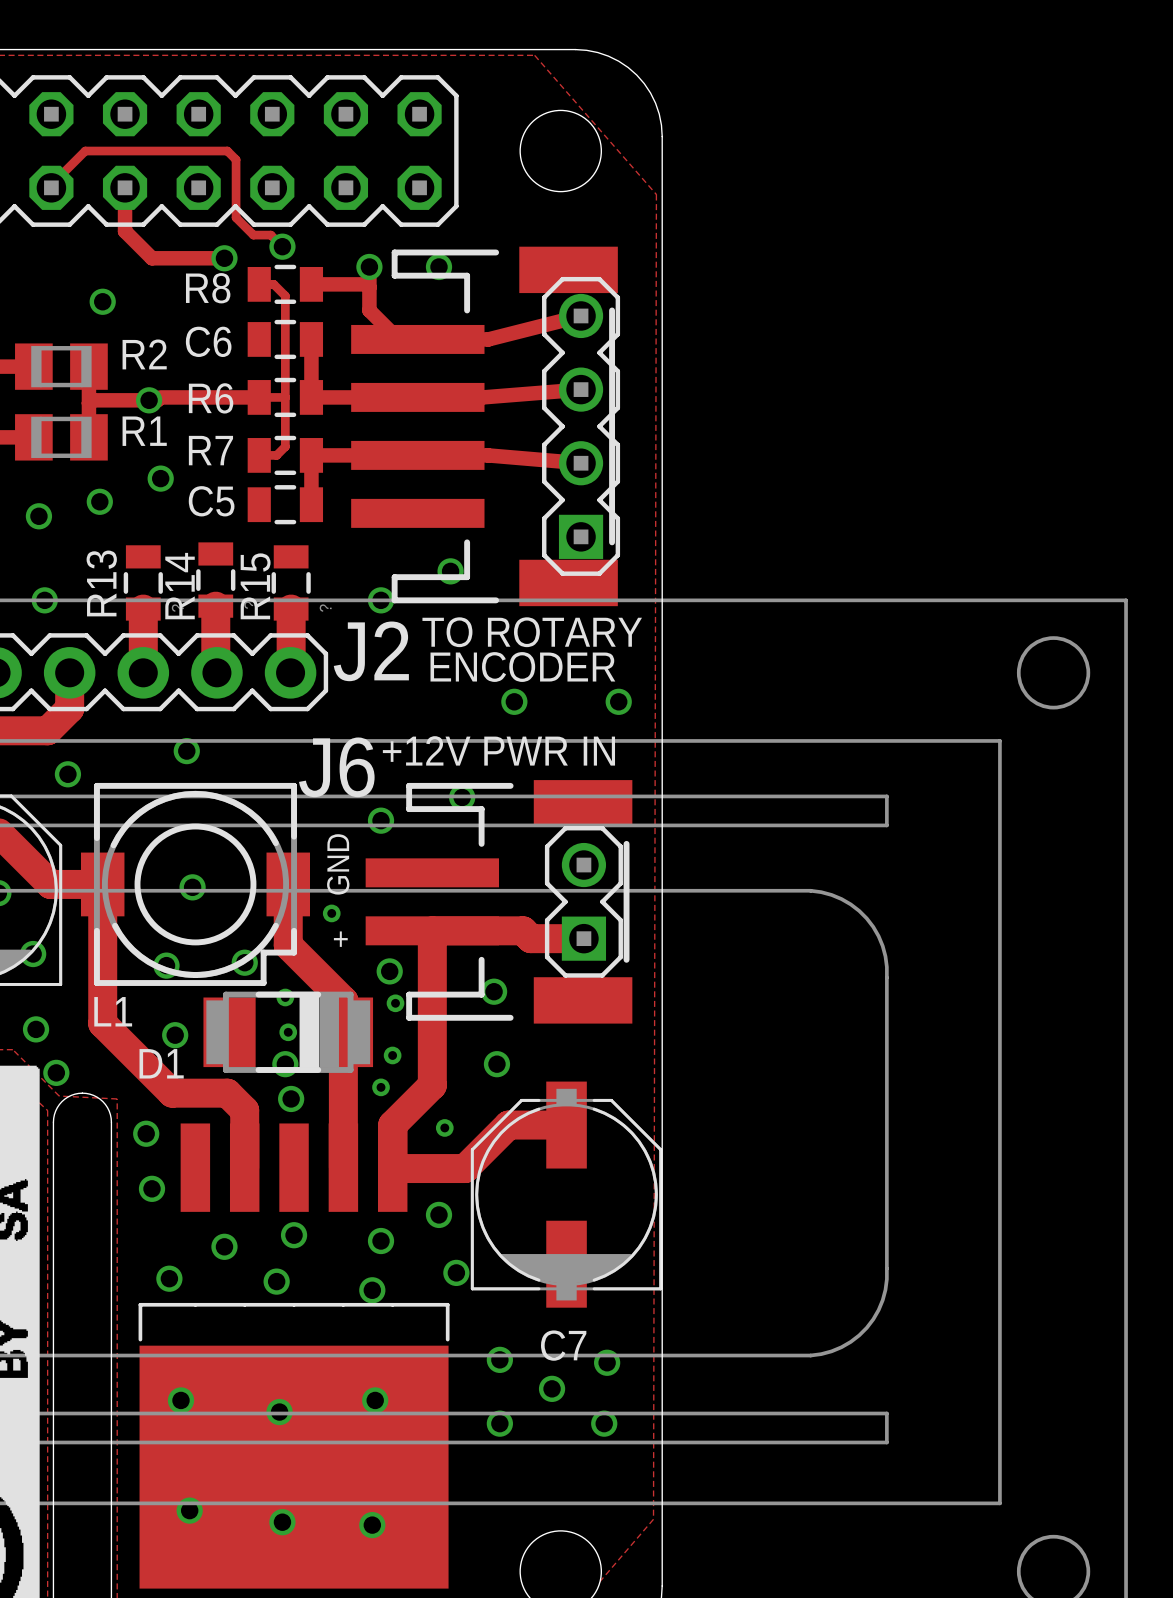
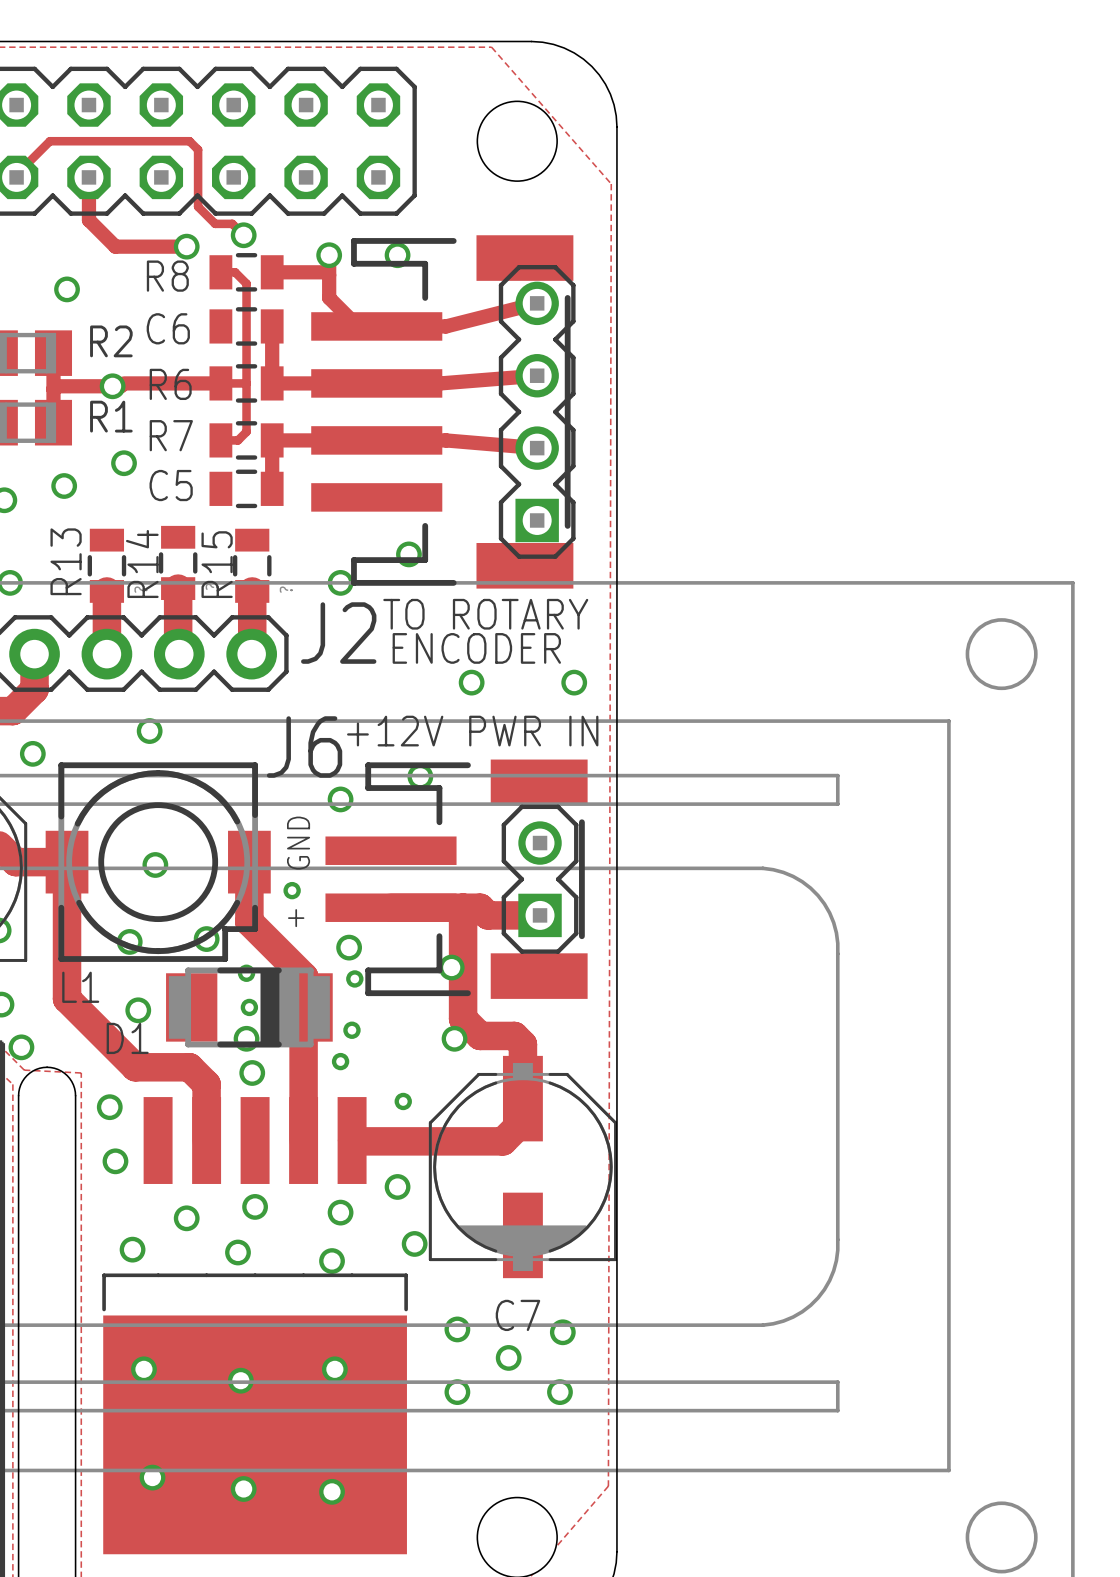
track: (432, 930) (432, 1085) (392, 1124) (392, 1167) -> none
track: (566, 1125) (508, 1125) (465, 1168) -> (463, 907) (463, 1018) (480, 1035) (514, 1035) (522, 1044) (522, 1098) (520, 1101) (520, 1124) (502, 1141) (423, 1141)

